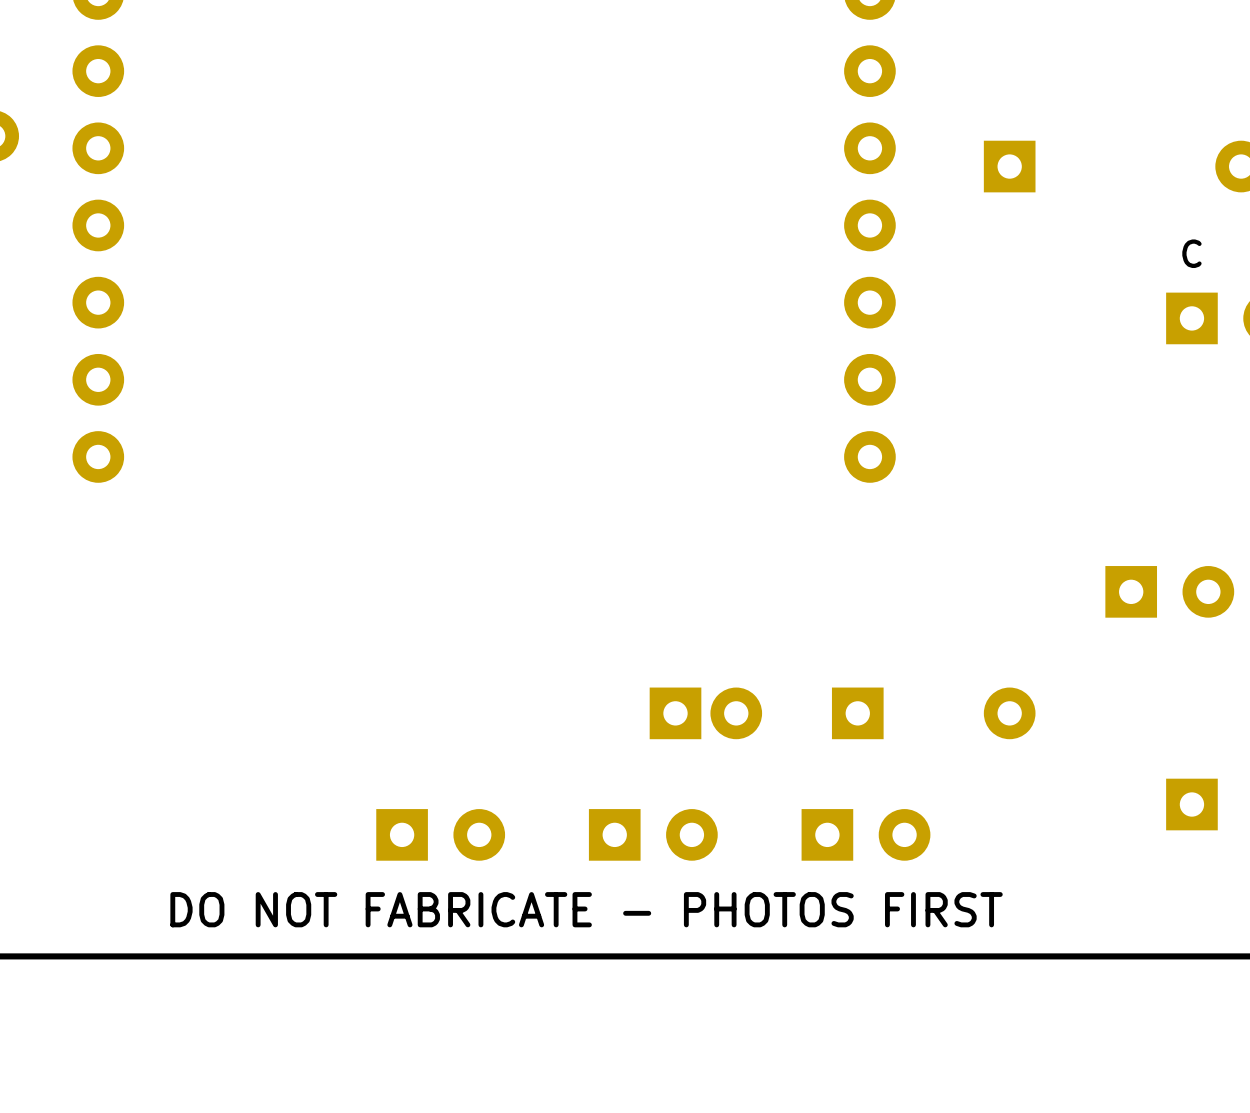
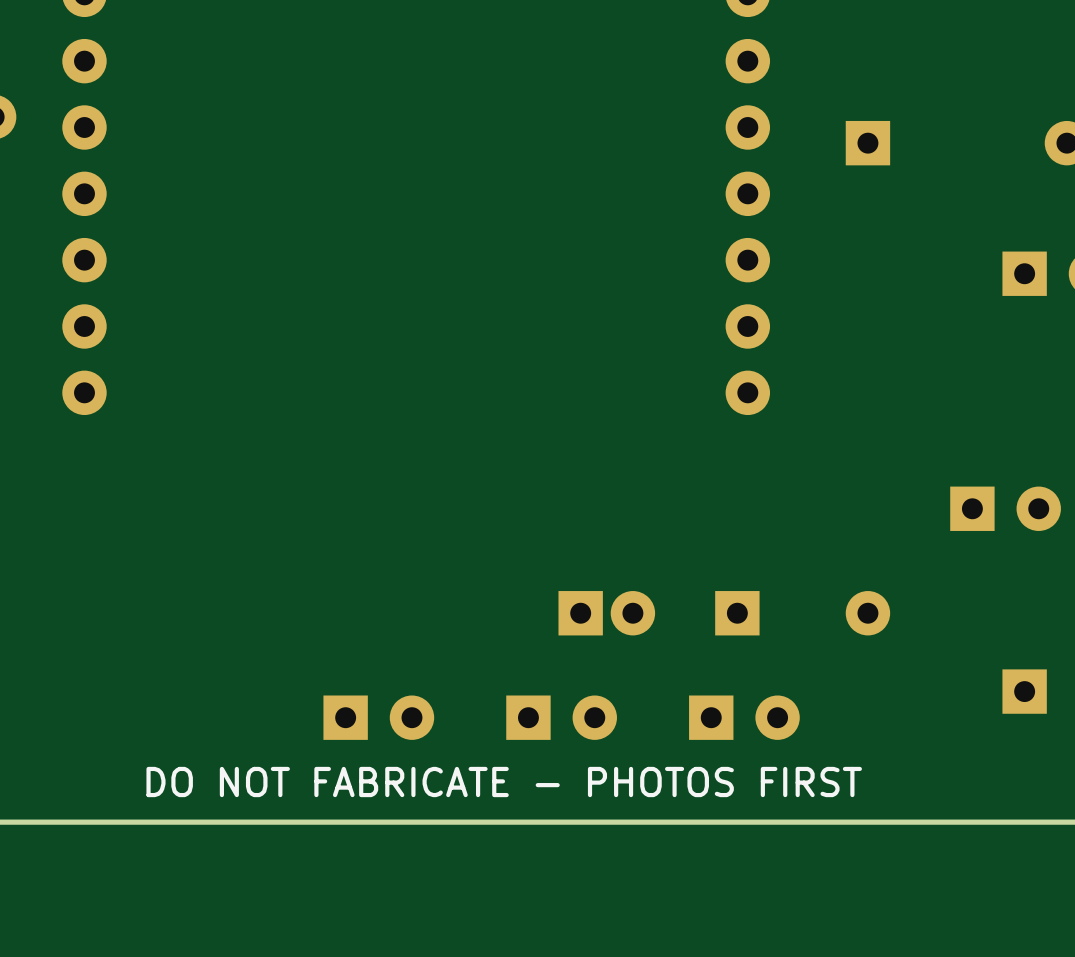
part text: C (1191, 253) -> none

